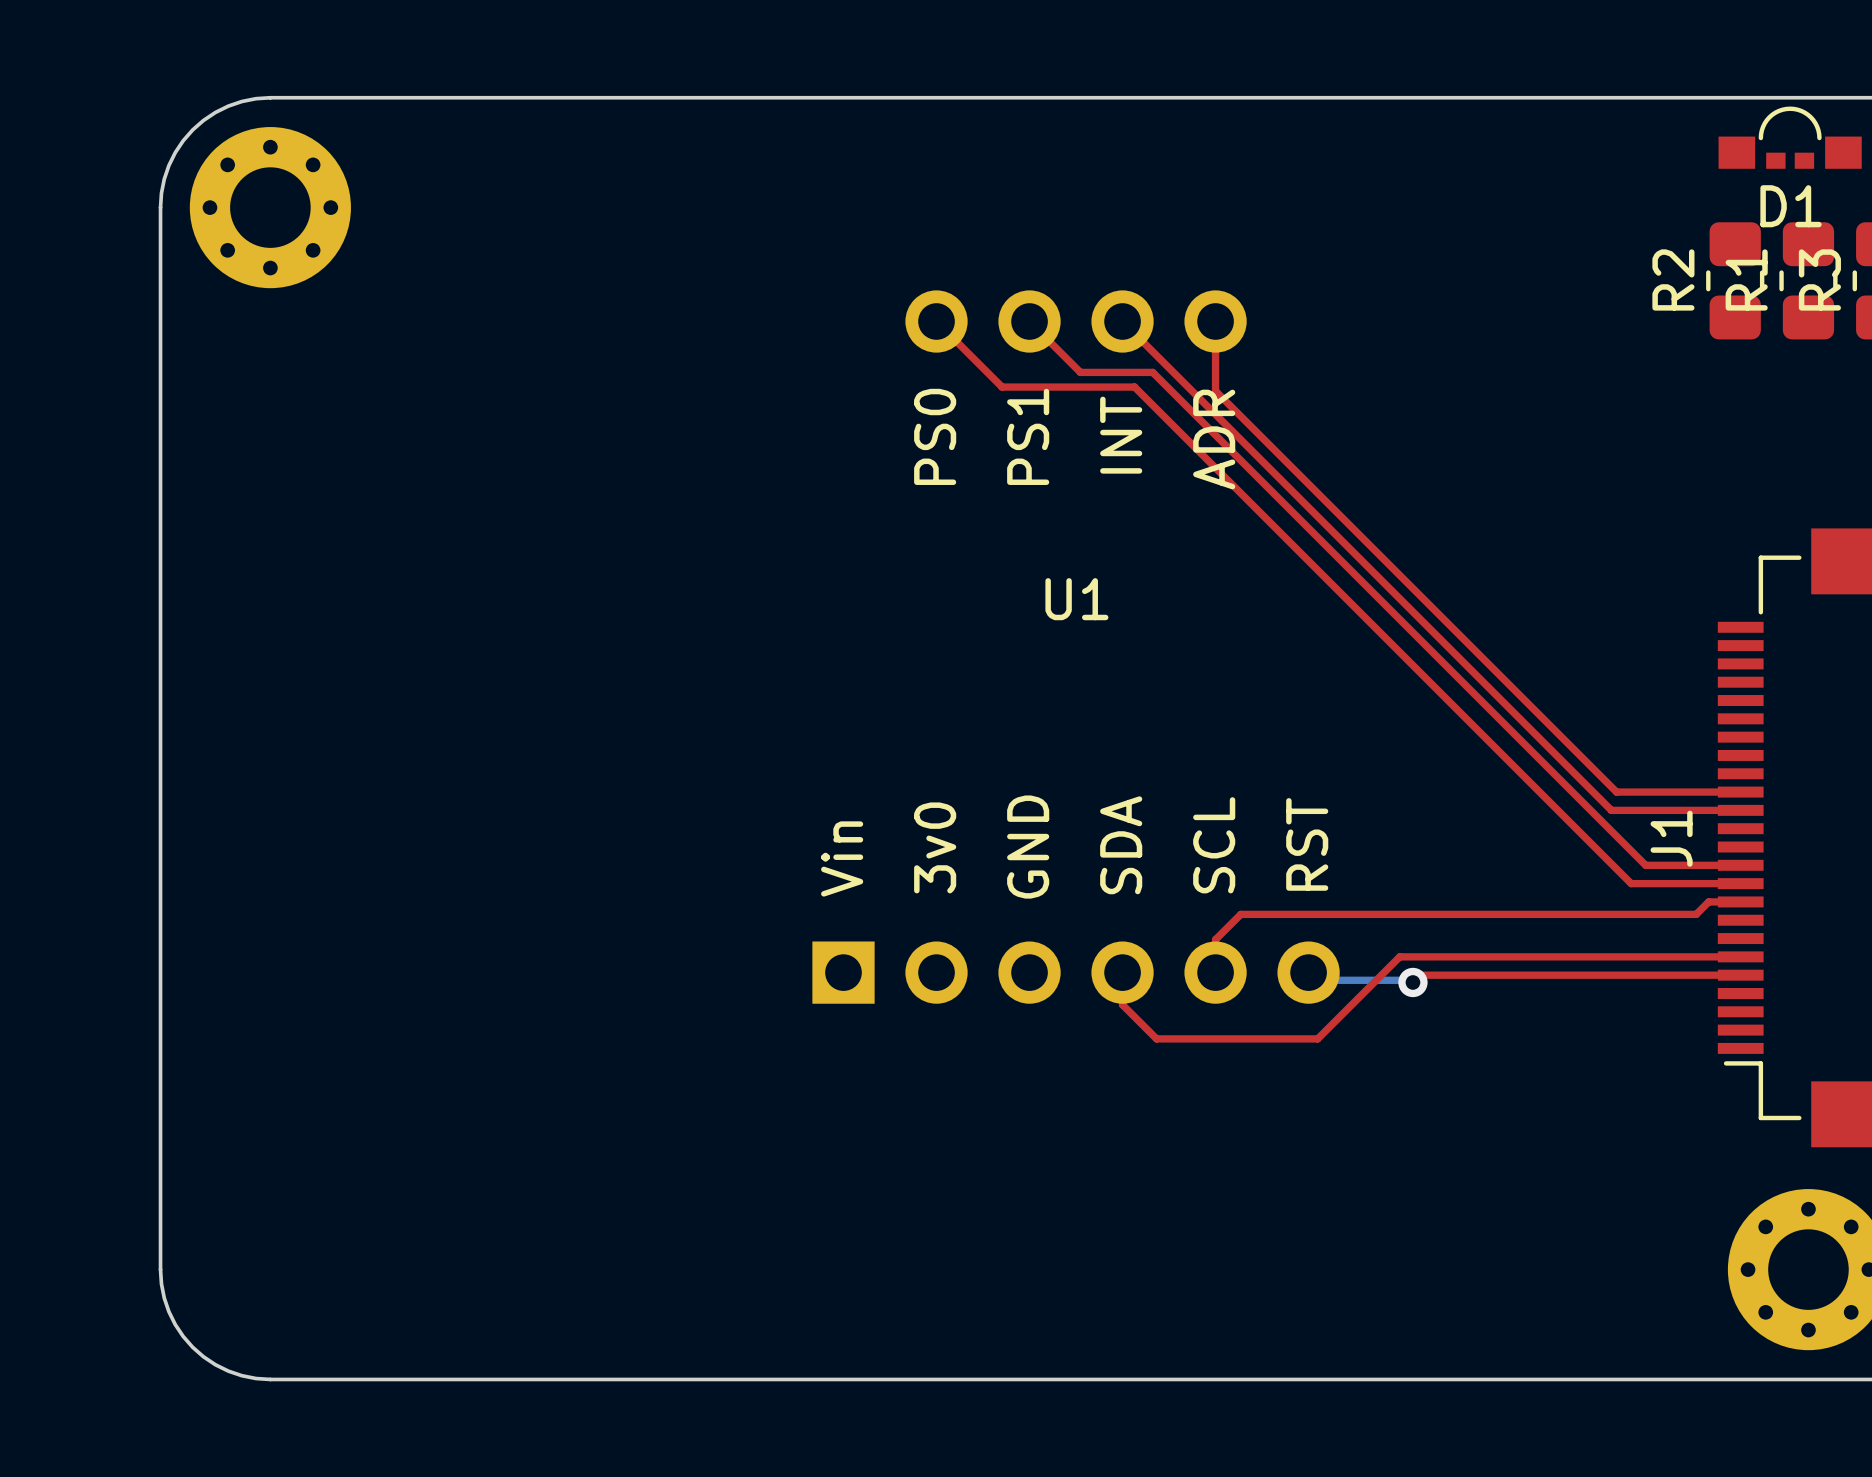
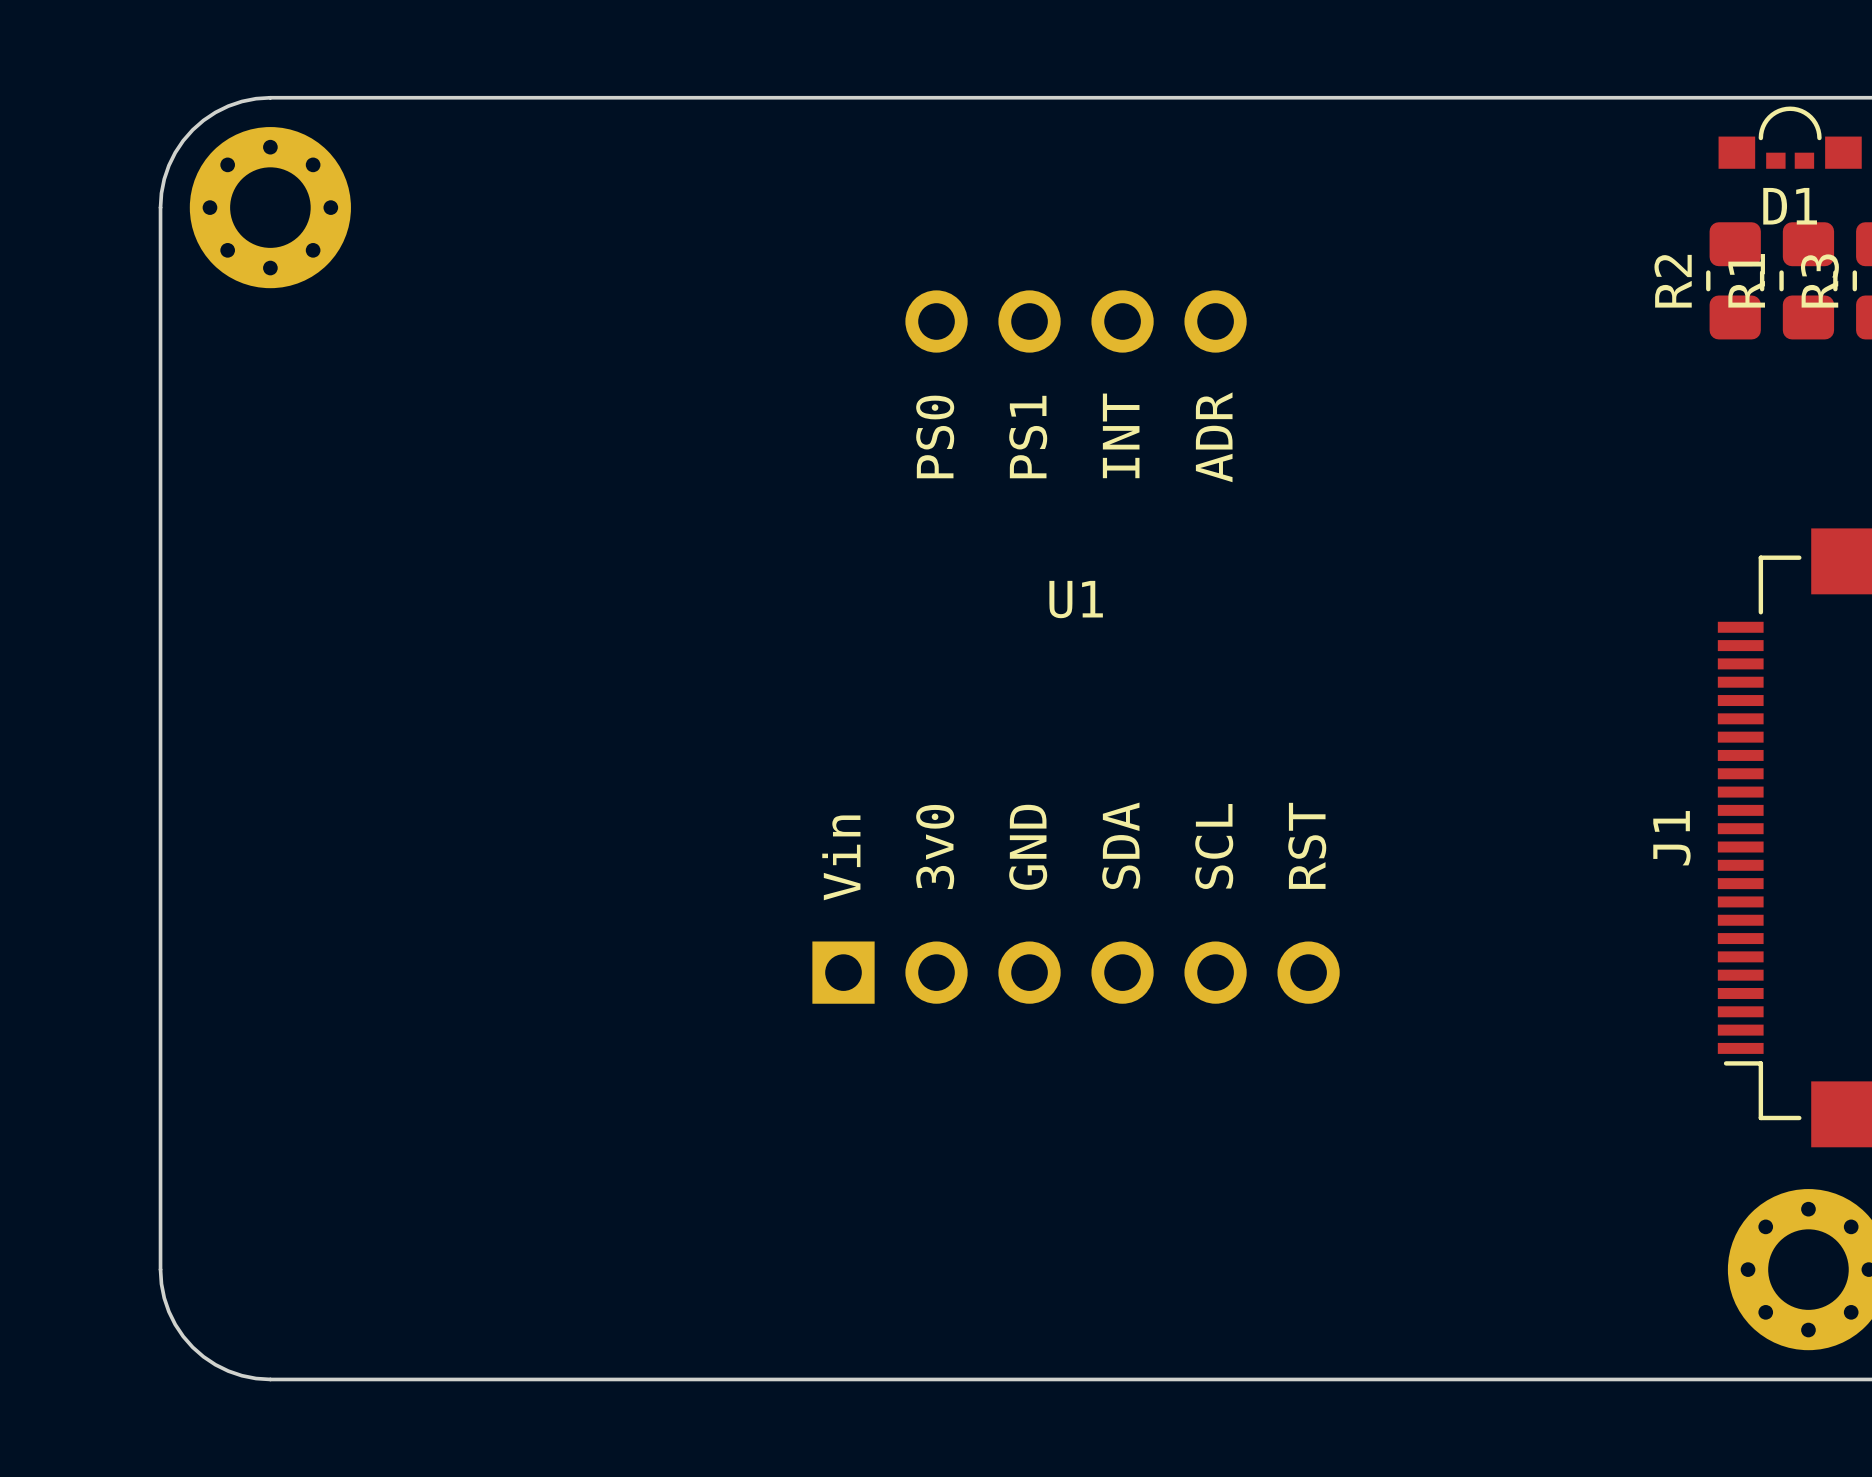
top track: (936, 321) (1002, 387) (1134, 387) (1631, 883) (1740, 883) -> none
top track: (1029, 321) (1080, 372) (1152, 372) (1645, 865) (1740, 865) -> none
top track: (1122, 321) (1611, 810) (1740, 810) -> none
top track: (1215, 321) (1215, 391) (1616, 792) (1740, 792) -> none
top track: (1740, 901) (1708, 901) (1696, 914) (1240, 914) (1215, 939) (1215, 972) -> none
top track: (1740, 956) (1399, 956) (1317, 1038) (1156, 1038) (1122, 1004) (1122, 972) -> none
bottom track: (1308, 972) (1316, 980) (1410, 980) (1412, 982) -> none
top track: (1740, 975) (1420, 975) (1412, 982) -> none
via: (1412, 982) -> none

